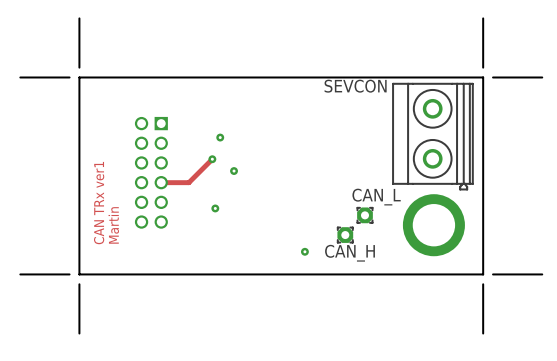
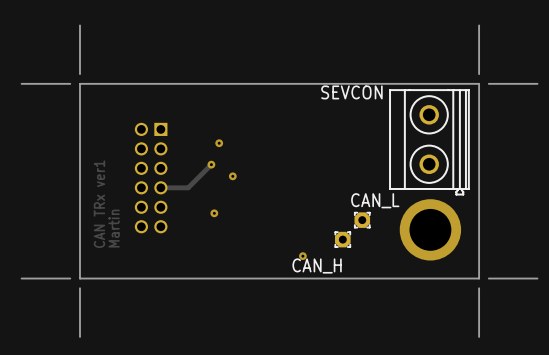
CAN_H name position: CAN_H (350, 253) -> CAN_H (317, 265)

